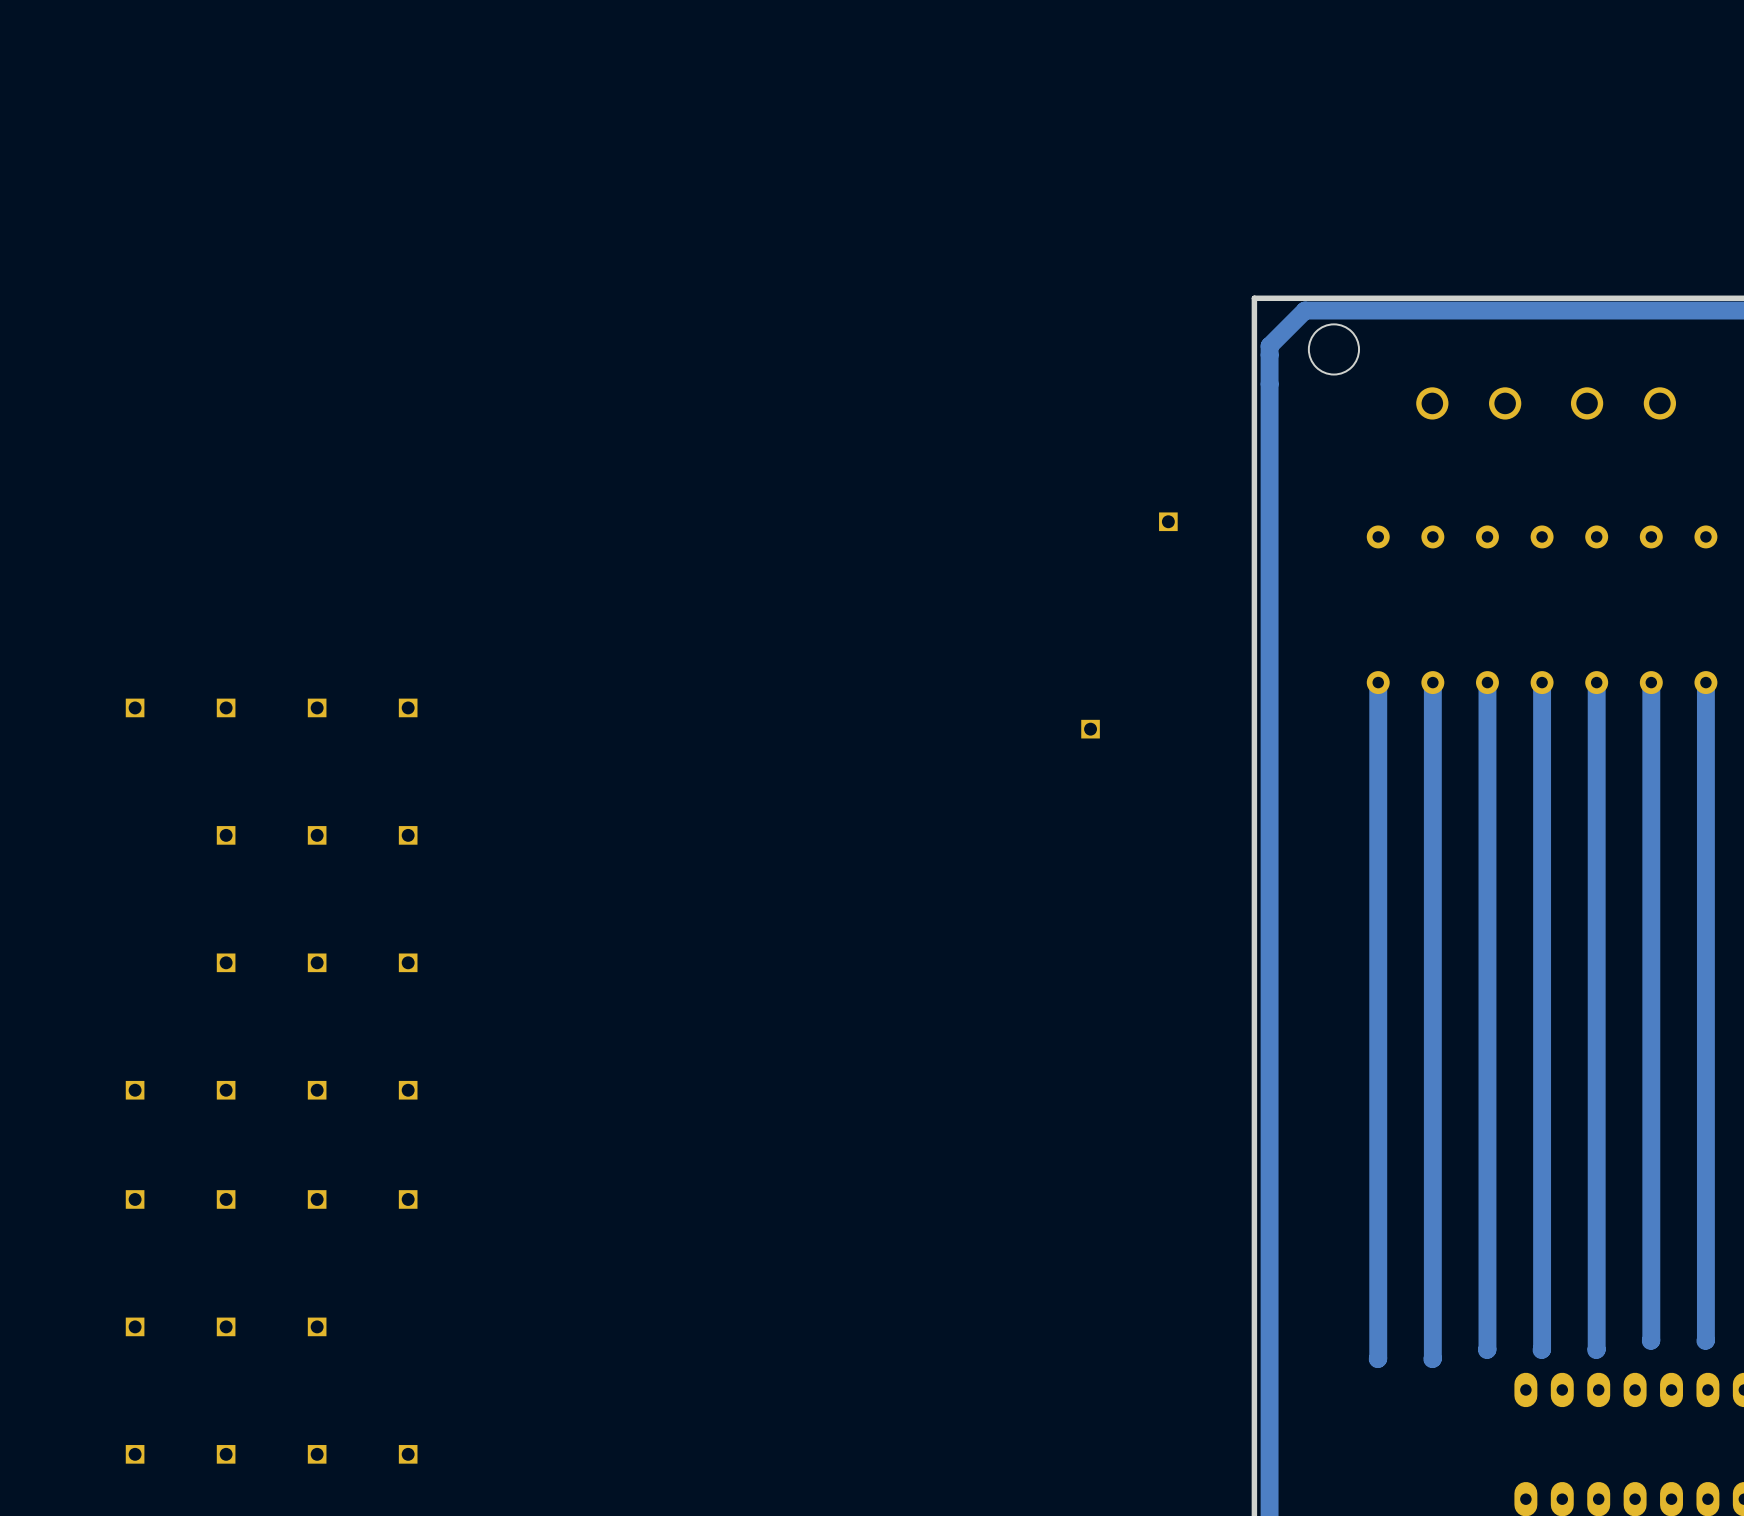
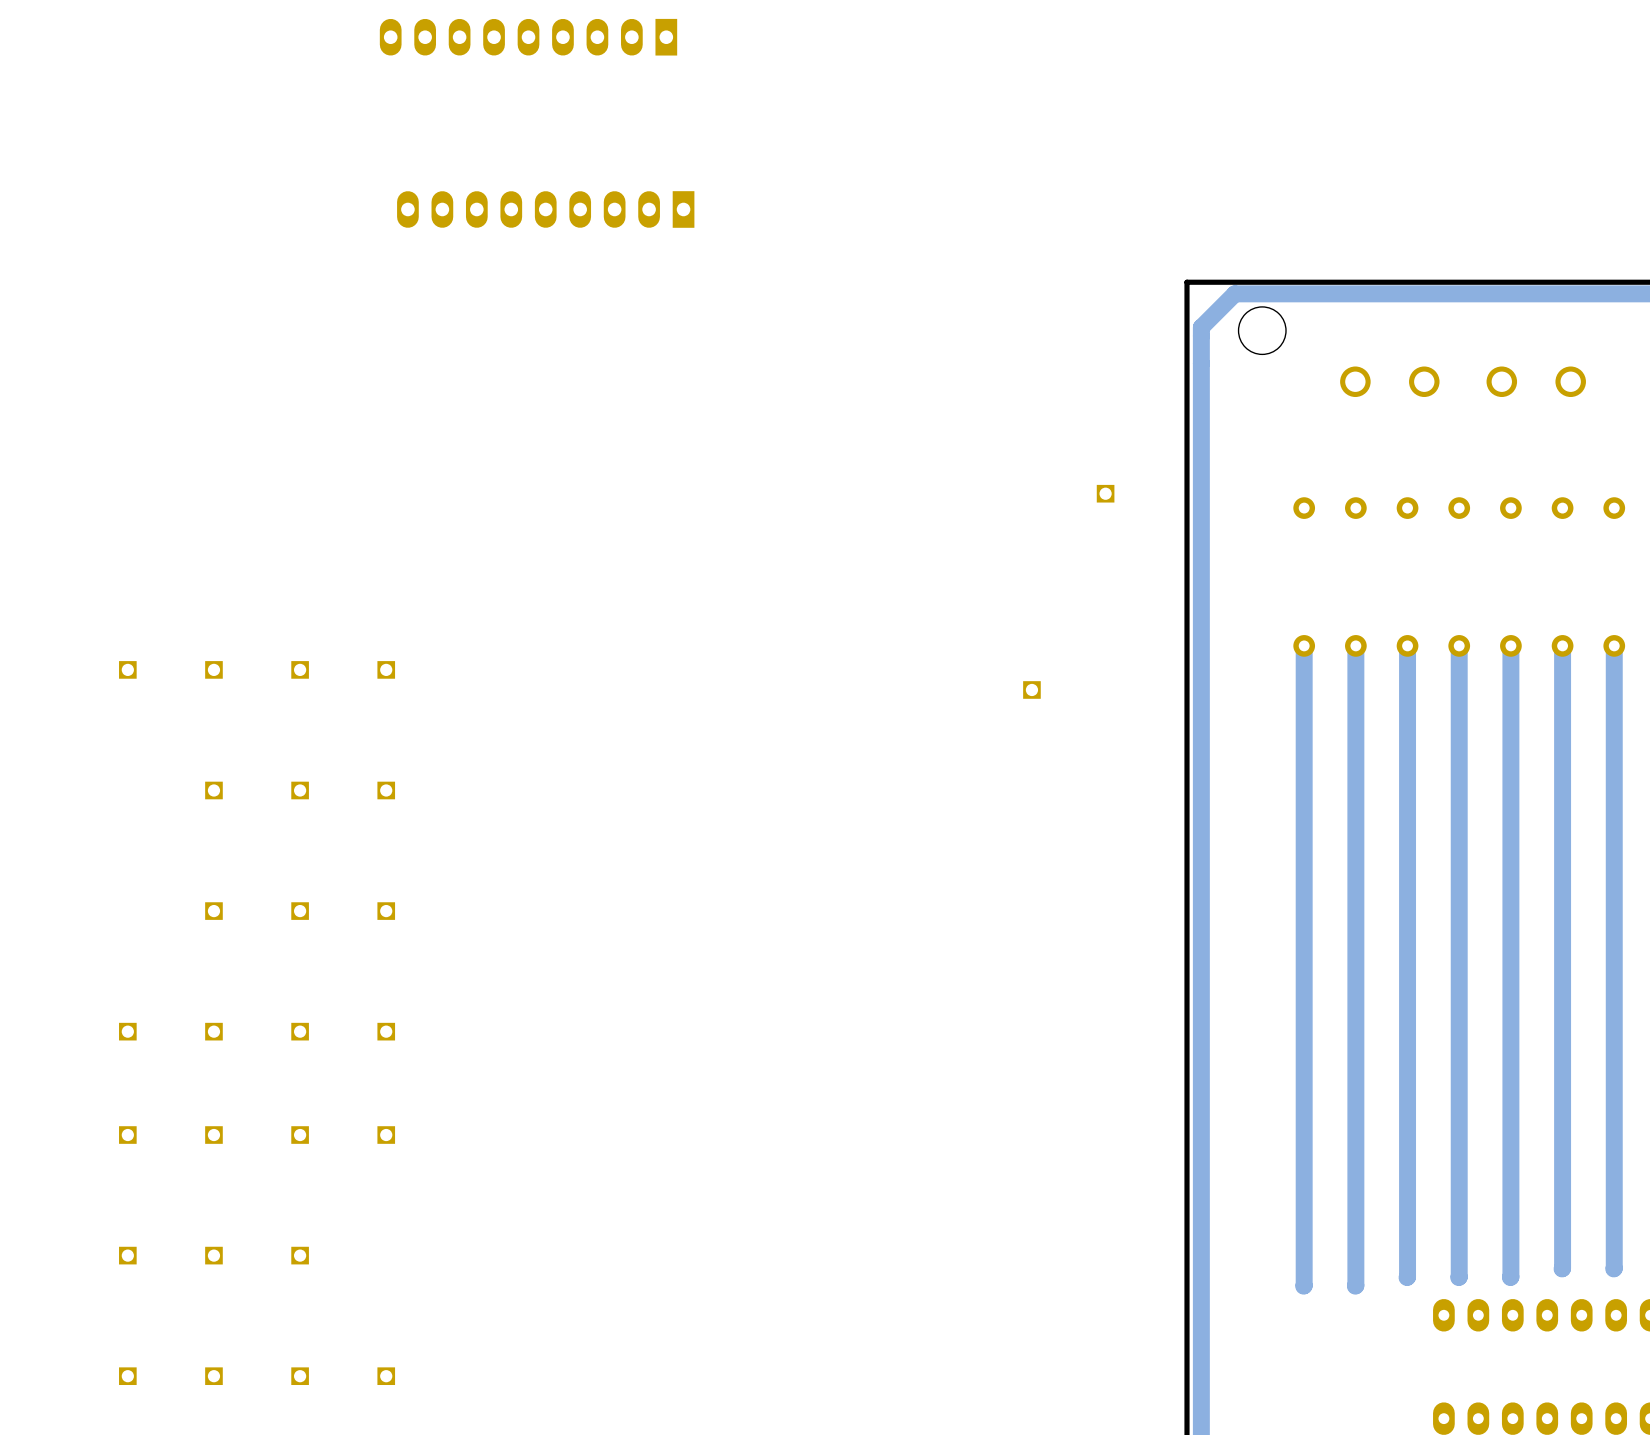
part: none -> (528, 37)
part: none -> (545, 209)

